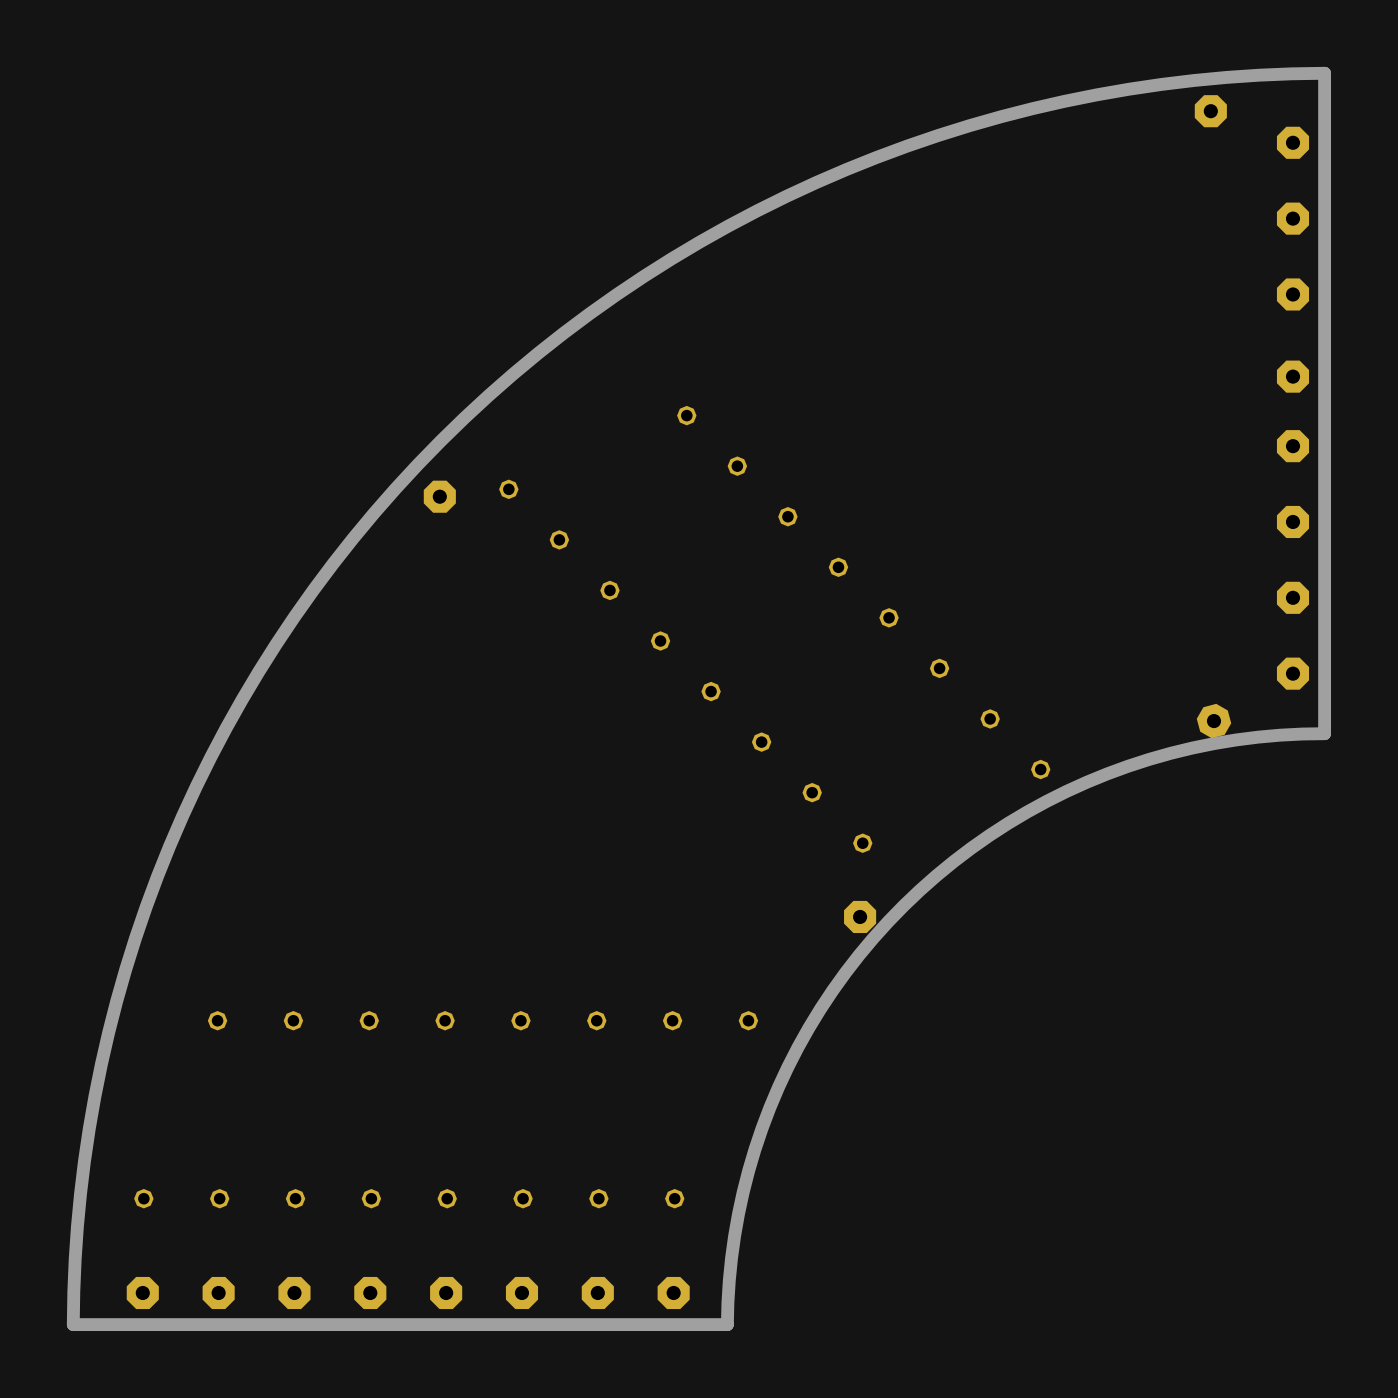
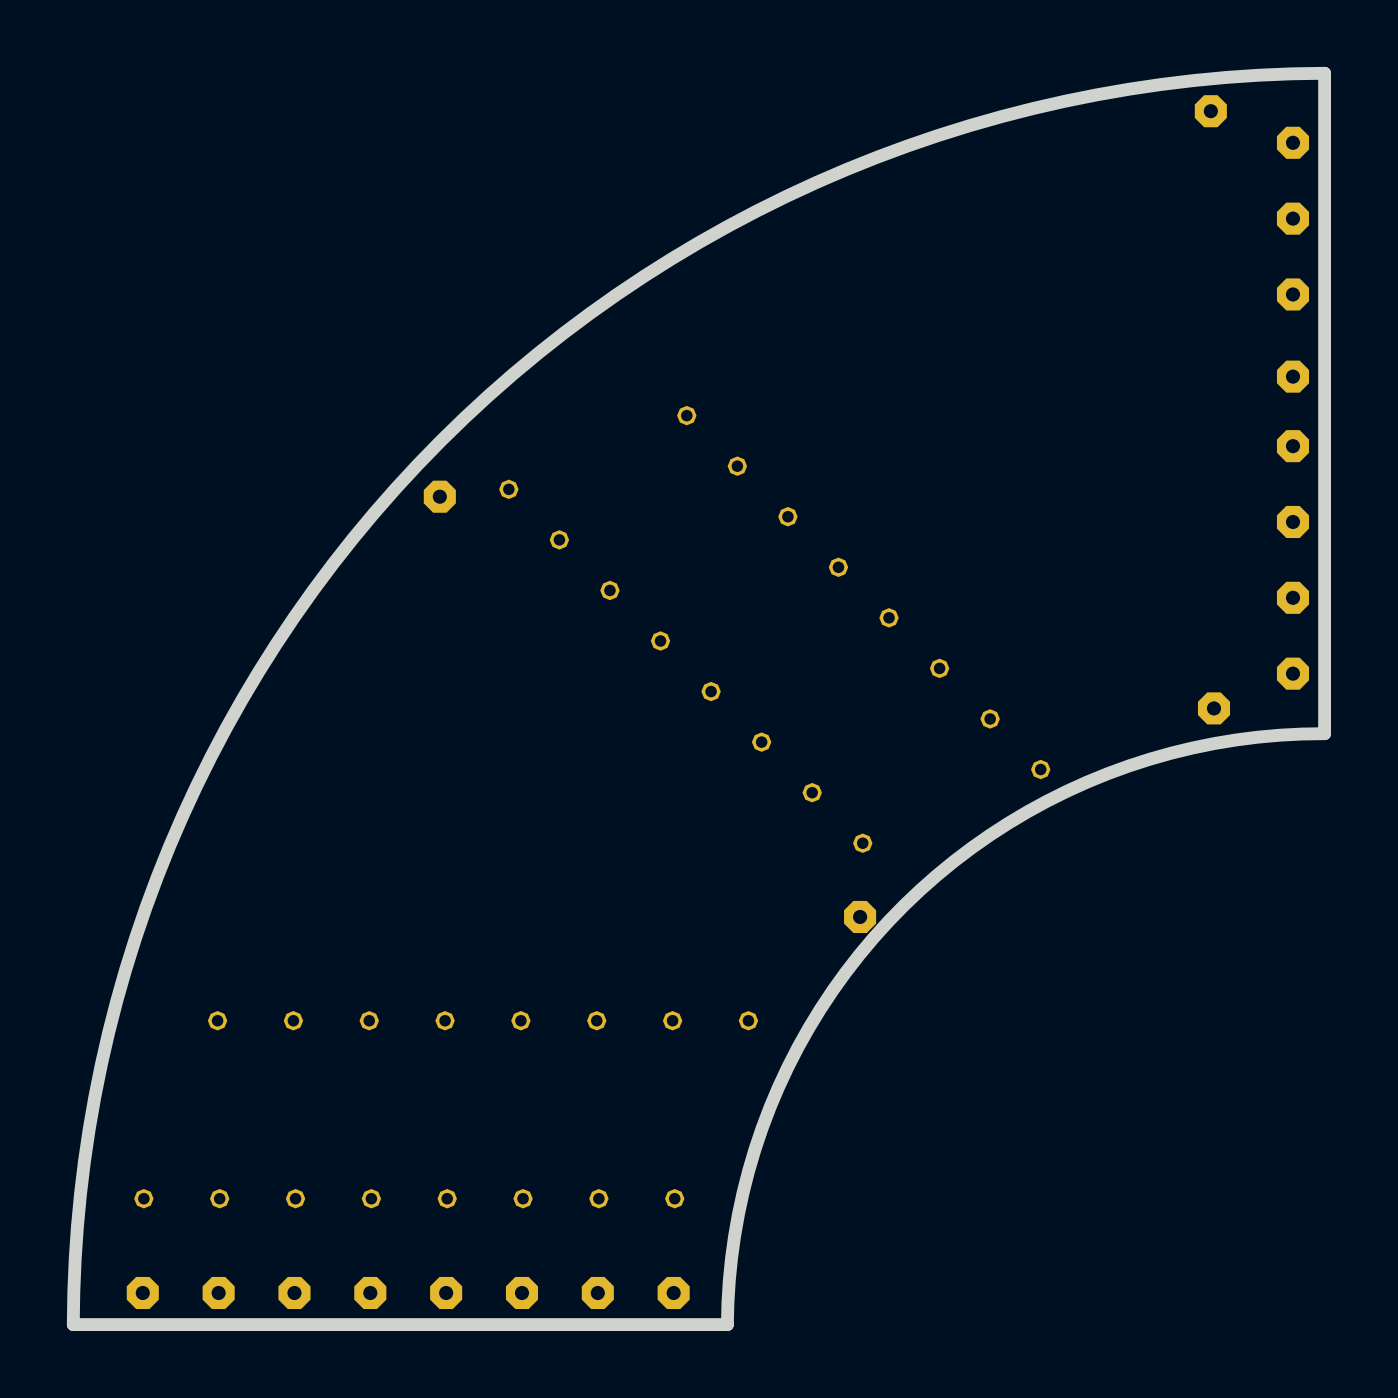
part rotation: 0° (1213, 721) -> 15° clockwise (1213, 708)

